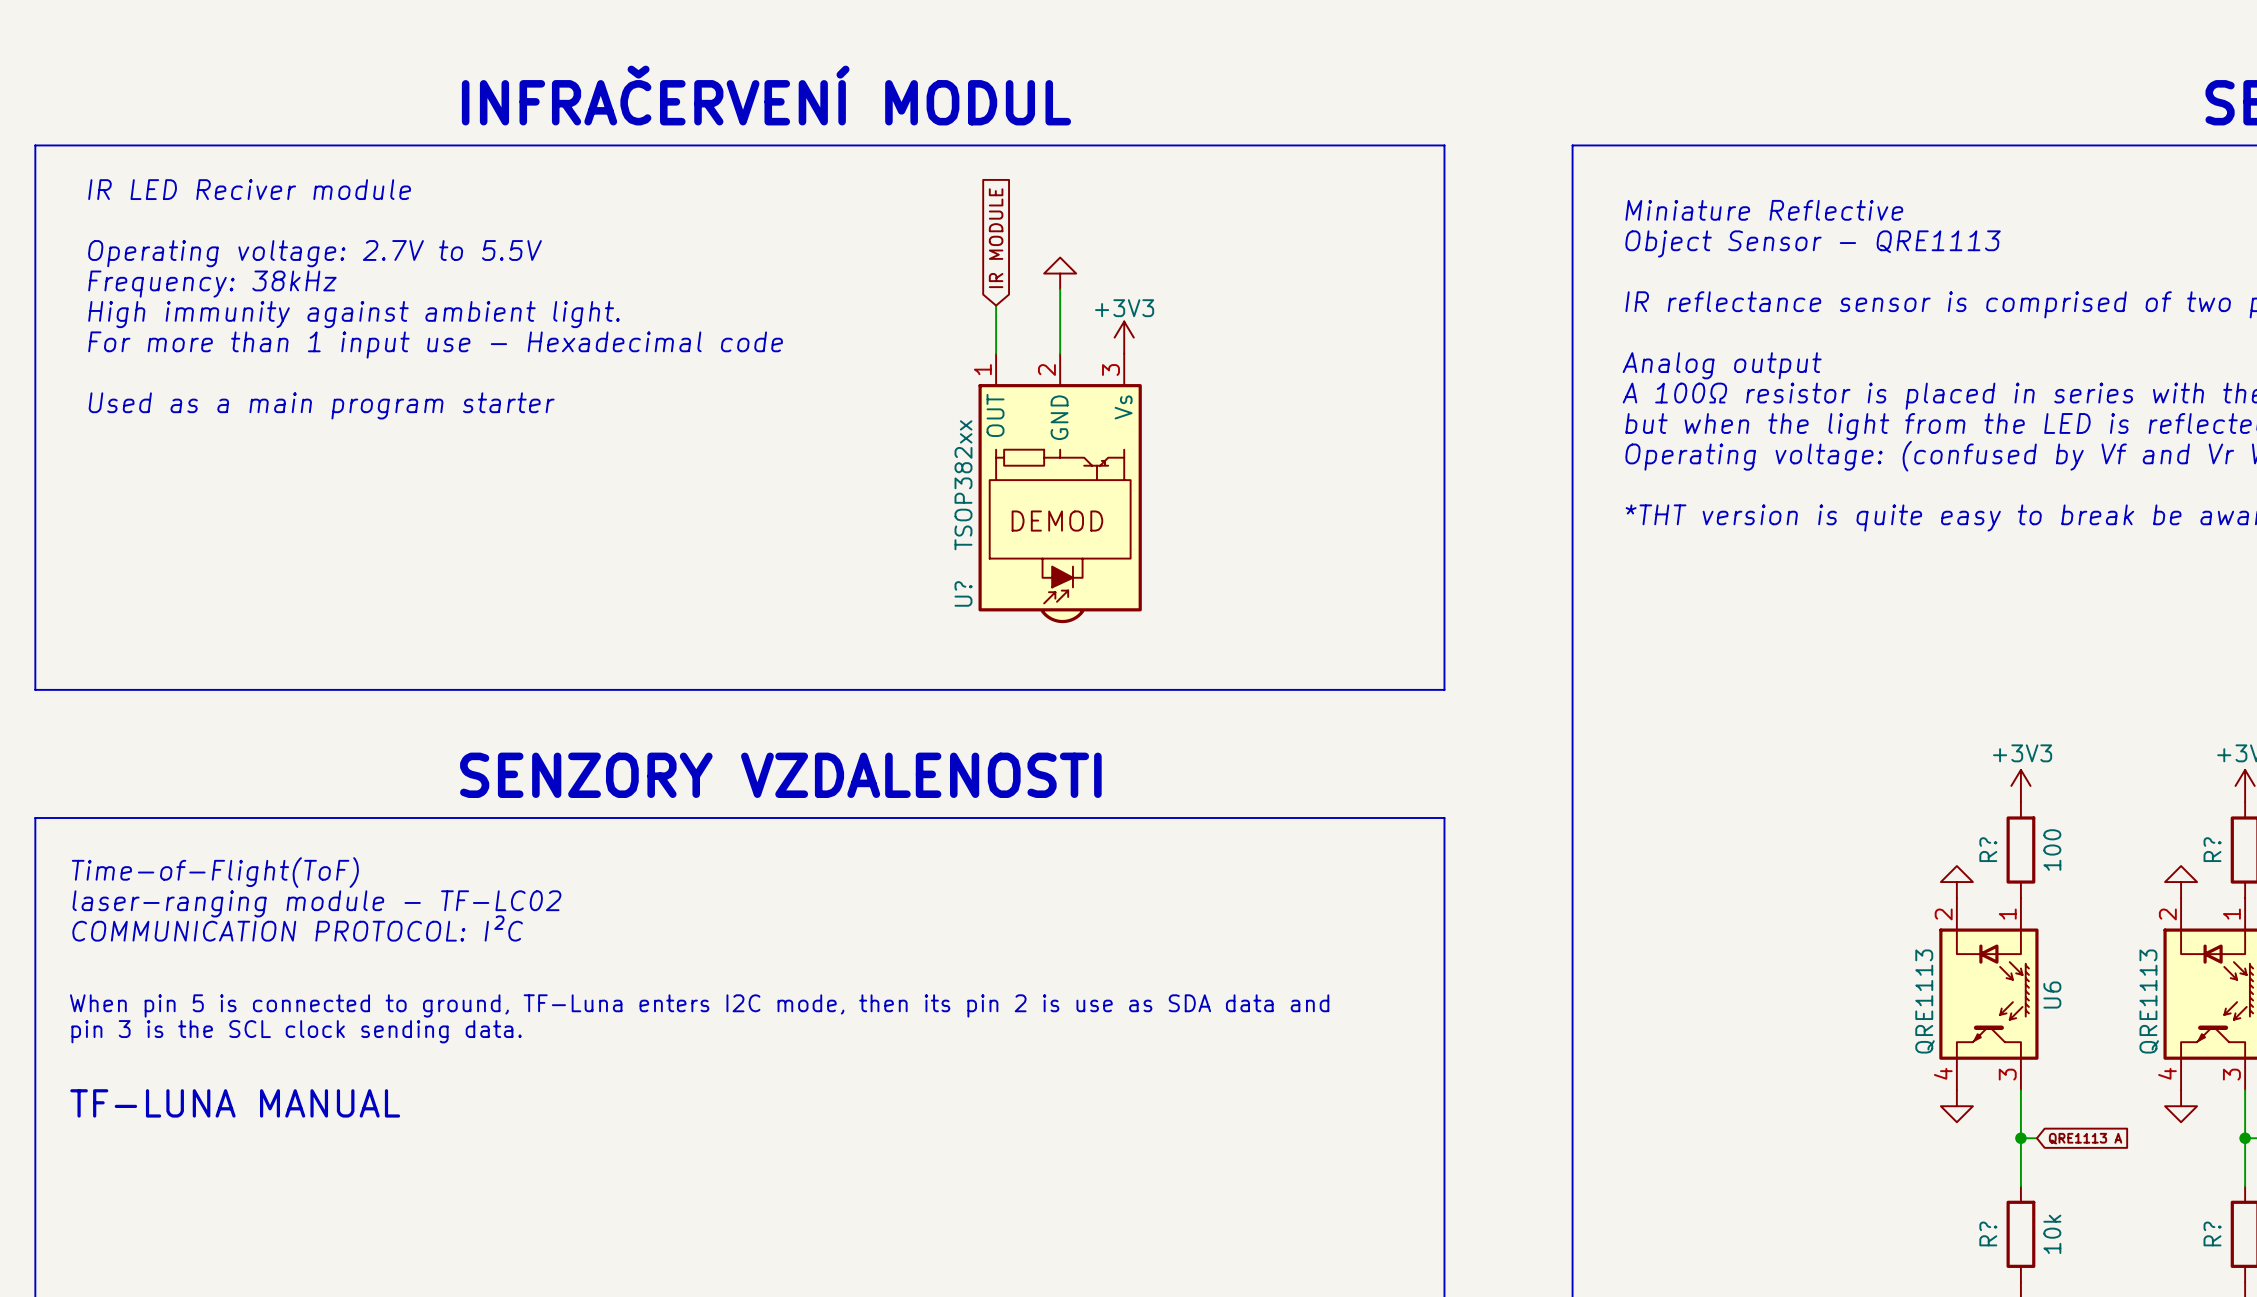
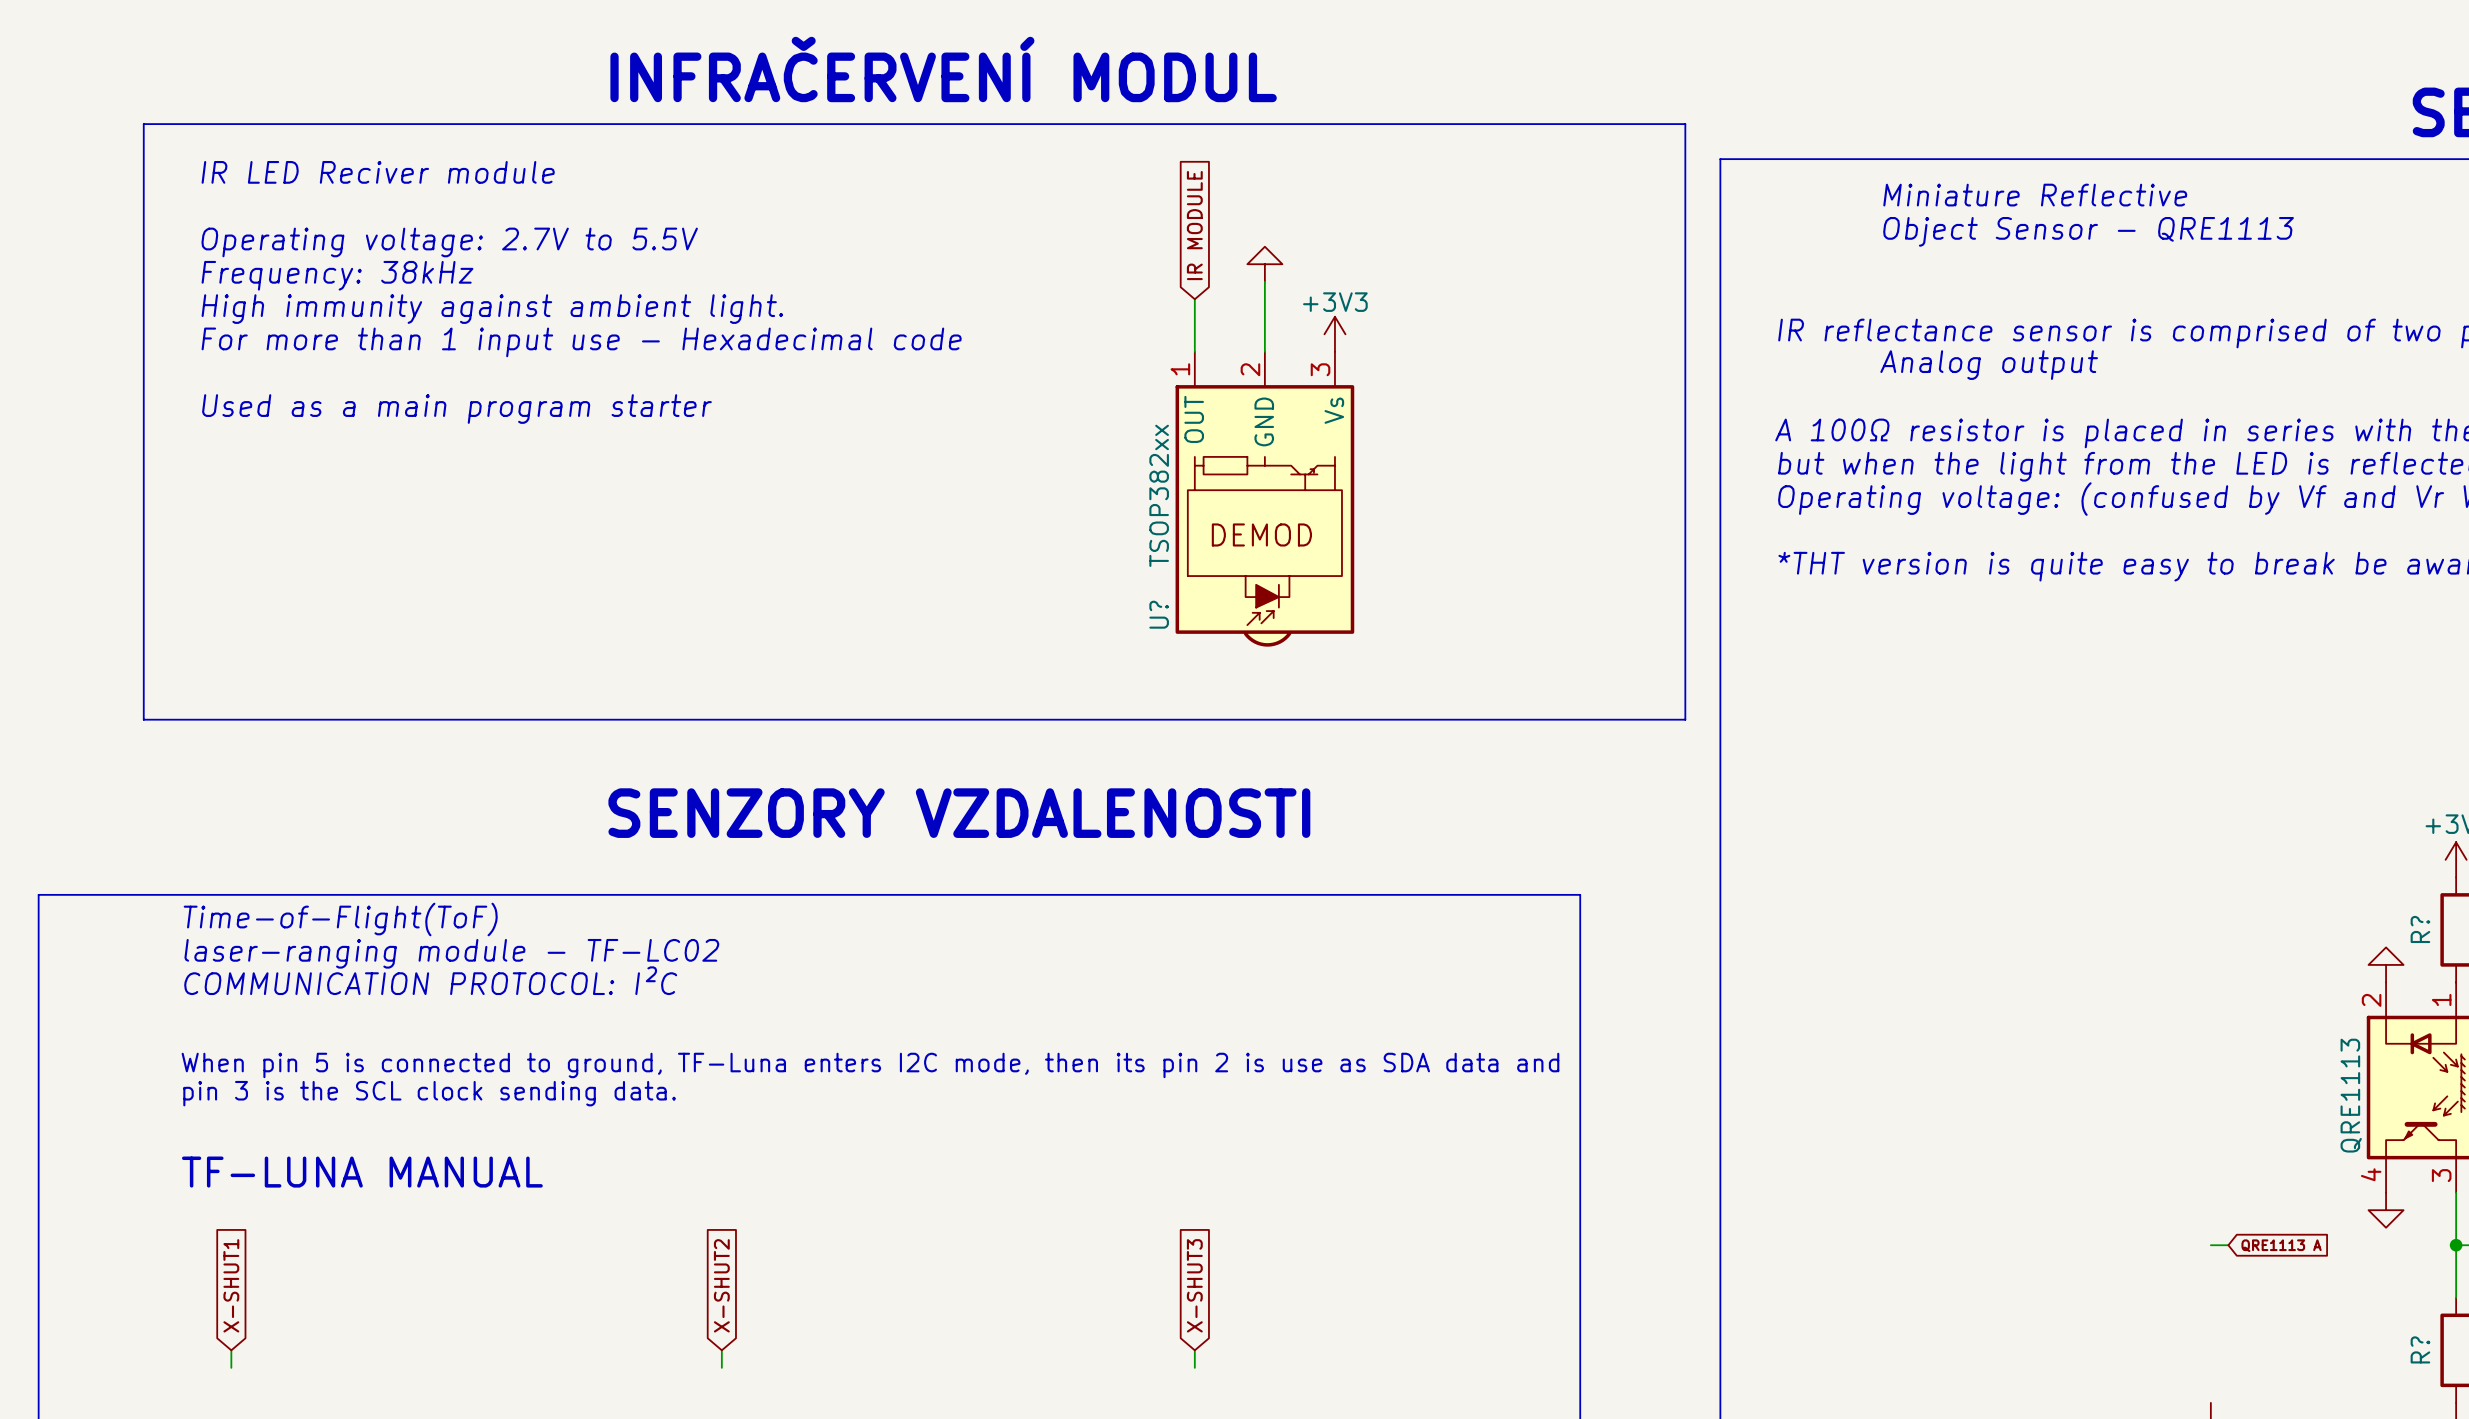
text position: INFRAČERVENÍ MODUL (766, 95) -> INFRAČERVENÍ MODUL (943, 69)
line: (35, 145) (1444, 145) (1444, 689) (35, 689) (35, 145) -> (143, 124) (1685, 124) (1685, 719) (143, 719) (143, 124)
text position: IR LED Reciver module (249, 189) -> IR LED Reciver module (378, 172)
text position: Miniature Reflective (1764, 210) -> Miniature Reflective (2035, 195)
global label position: IR MODULE (996, 238) -> IR MODULE (1194, 225)
text position: Object Sensor - QRE1113 (1813, 243) -> Object Sensor - QRE1113 (2088, 231)
text position: Operating voltage: 2.7V to 5.5V (314, 253) -> Operating voltage: 2.7V to 5.5V (449, 242)
power symbol position: (1060, 273) -> (1264, 264)
text position: Frequency: 38kHz (212, 284) -> Frequency: 38kHz (337, 275)
wire: (1060, 289) (1060, 353) -> (1264, 281) (1264, 351)
wire: (996, 305) (996, 353) -> (1194, 299) (1194, 351)
text position: High immunity against ambient light. (353, 314) -> High immunity against ambient light. (492, 309)
power symbol position: +3V3 (1124, 337) -> +3V3 (1334, 334)
text position: For more than 1 input use - Hexadecimal code (435, 345) -> For more than 1 input use - Hexadecimal code (581, 342)
text position: Analog output (1722, 365) -> Analog output (1989, 365)
text position: Used as a main program starter (321, 405) -> Used as a main program starter (456, 409)
U? position: (1060, 488) -> (1264, 499)
text position: SENZORY VZDALENOSTI (780, 775) -> SENZORY VZDALENOSTI (959, 813)
power symbol: +3V3 (2020, 785) -> none
R?: 100 (2020, 850) -> none
text position: Time-of-Flight(ToF) (215, 872) -> Time-of-Flight(ToF) (340, 919)
power symbol: (1956, 882) -> none
text position: laser-ranging module - TF-LC02 (316, 903) -> laser-ranging module - TF-LC02 (451, 953)
text position: COMMUNICATION PROTOCOL: I²C (297, 928) -> COMMUNICATION PROTOCOL: I²C (430, 980)
U6: QRE1113 (1988, 994) -> none
text position: When pin 5 is connected to ground, TF-Luna enters I2C mode, then its pin 2 is use as SDA data and (699, 1005) -> When pin 5 is connected to ground, TF-Luna enters I2C mode, then its pin 2 is use as SDA data and (870, 1065)
text position: pin 3 is the SCL clock sending data. (296, 1031) -> pin 3 is the SCL clock sending data. (429, 1093)
wire: (2020, 1090) (2020, 1186) -> none
text position: TF-LUNA MANUAL (235, 1103) -> TF-LUNA MANUAL (362, 1172)
power symbol: (1956, 1106) -> none
junction: (2020, 1138) -> none
global label: none -> X-SHUT1 (231, 1285)
global label: none -> X-SHUT2 (721, 1285)
global label: none -> X-SHUT3 (1194, 1285)
wire: none -> (231, 1350) (231, 1367)
wire: none -> (721, 1350) (721, 1367)
wire: none -> (1194, 1350) (1194, 1367)
R?: 10k (2020, 1234) -> none

